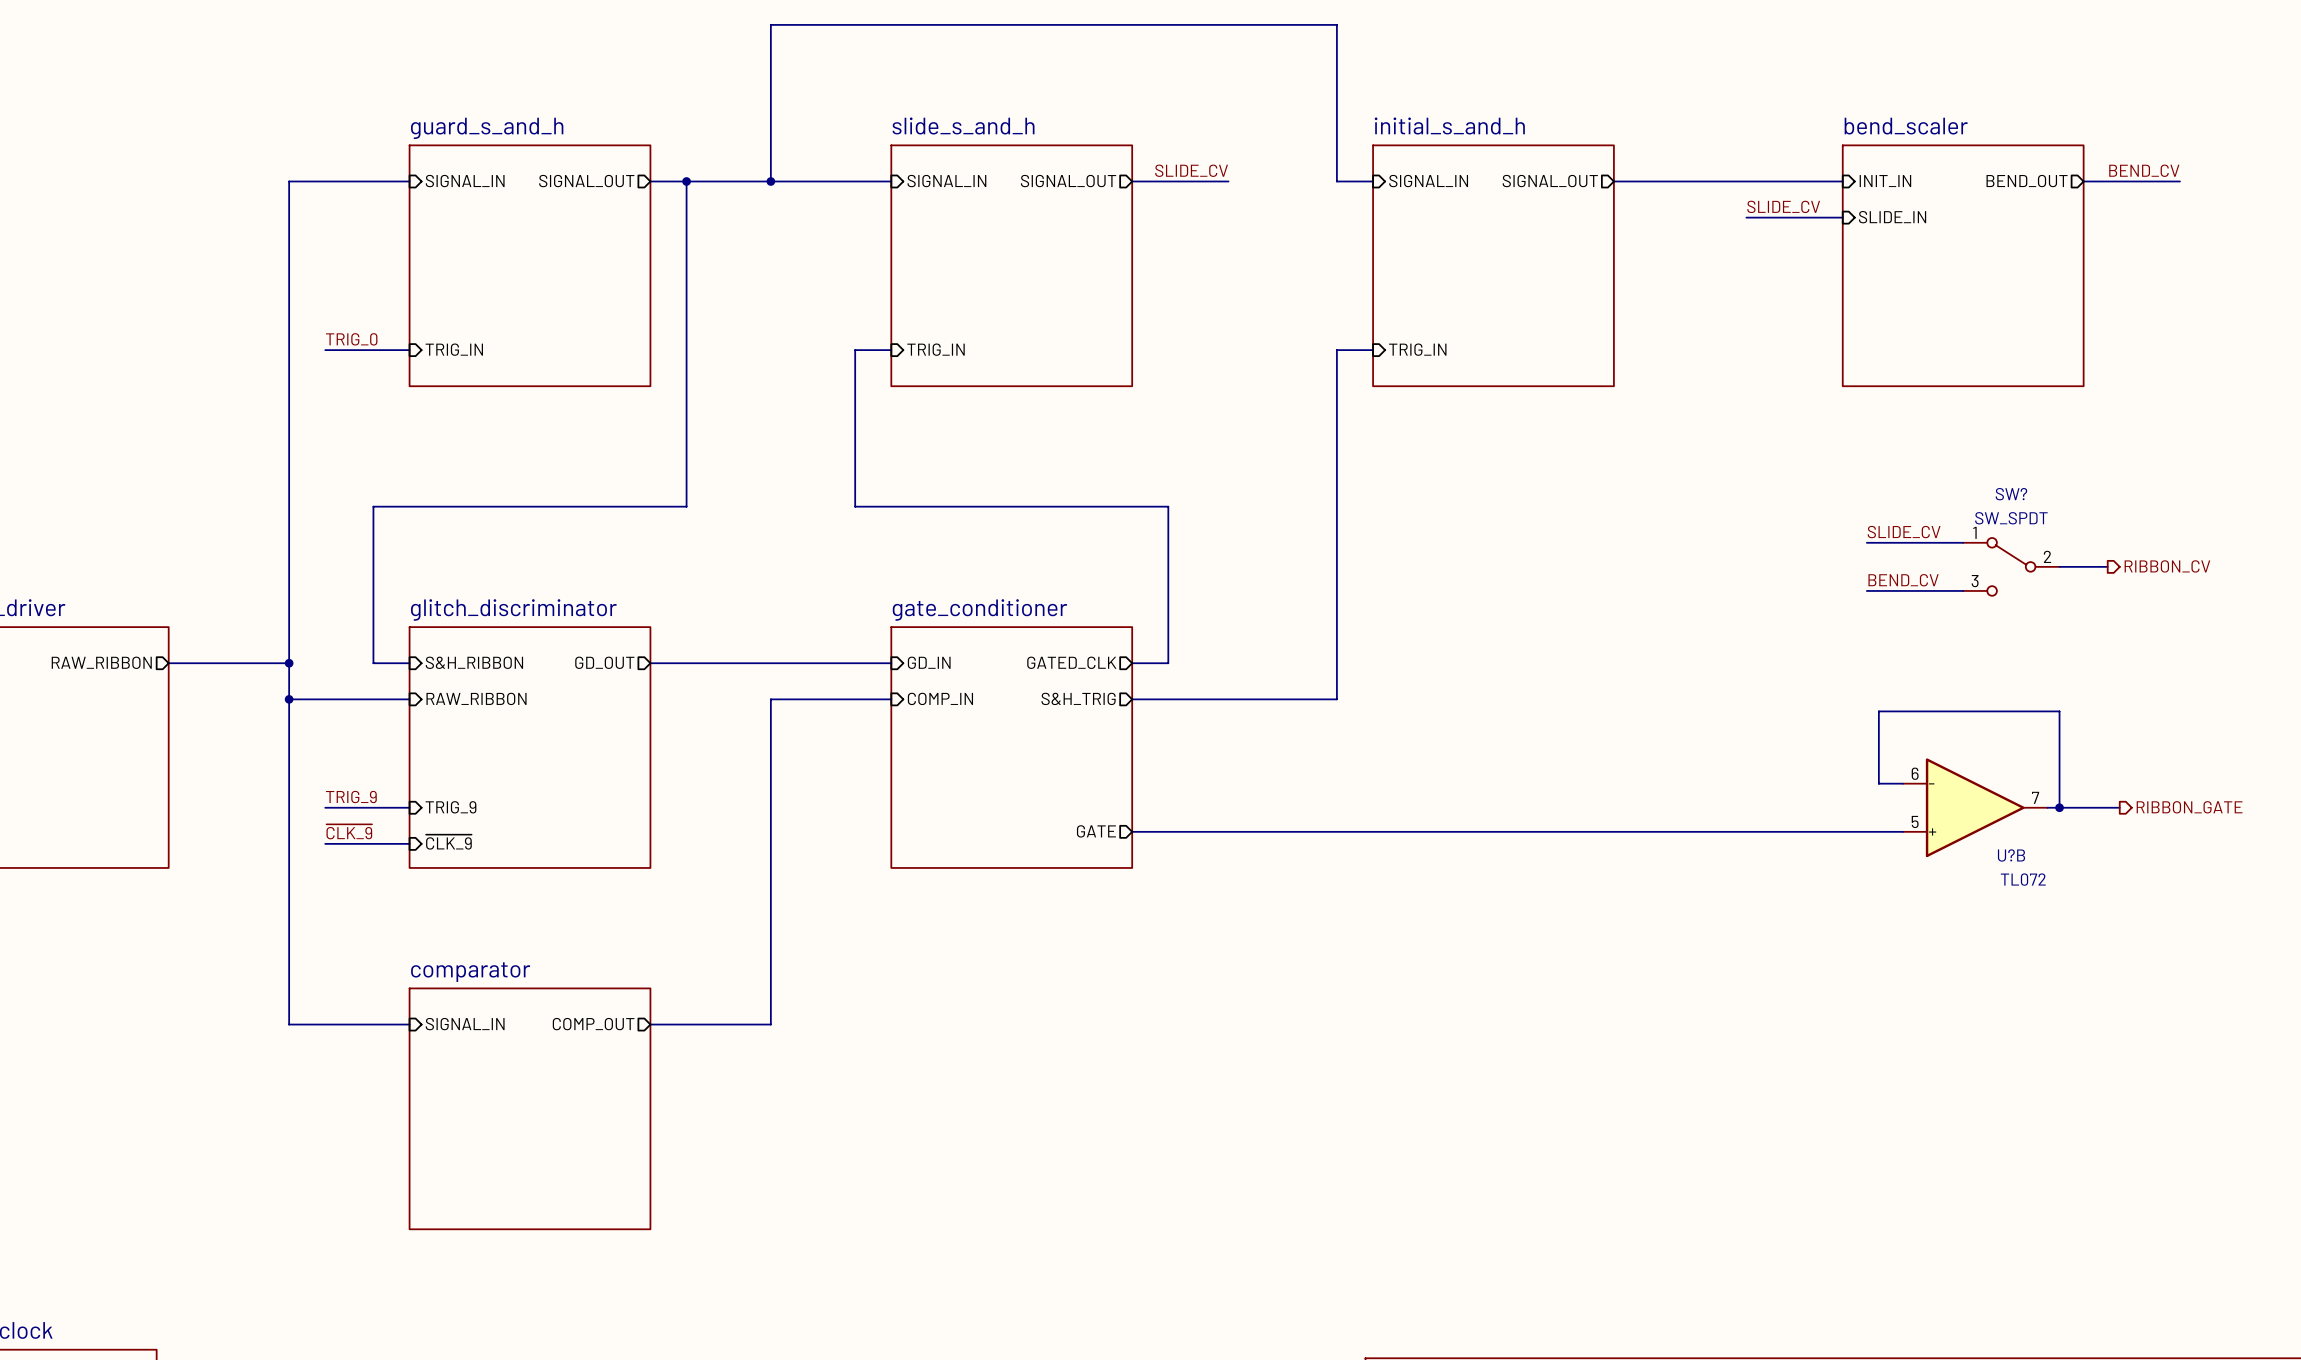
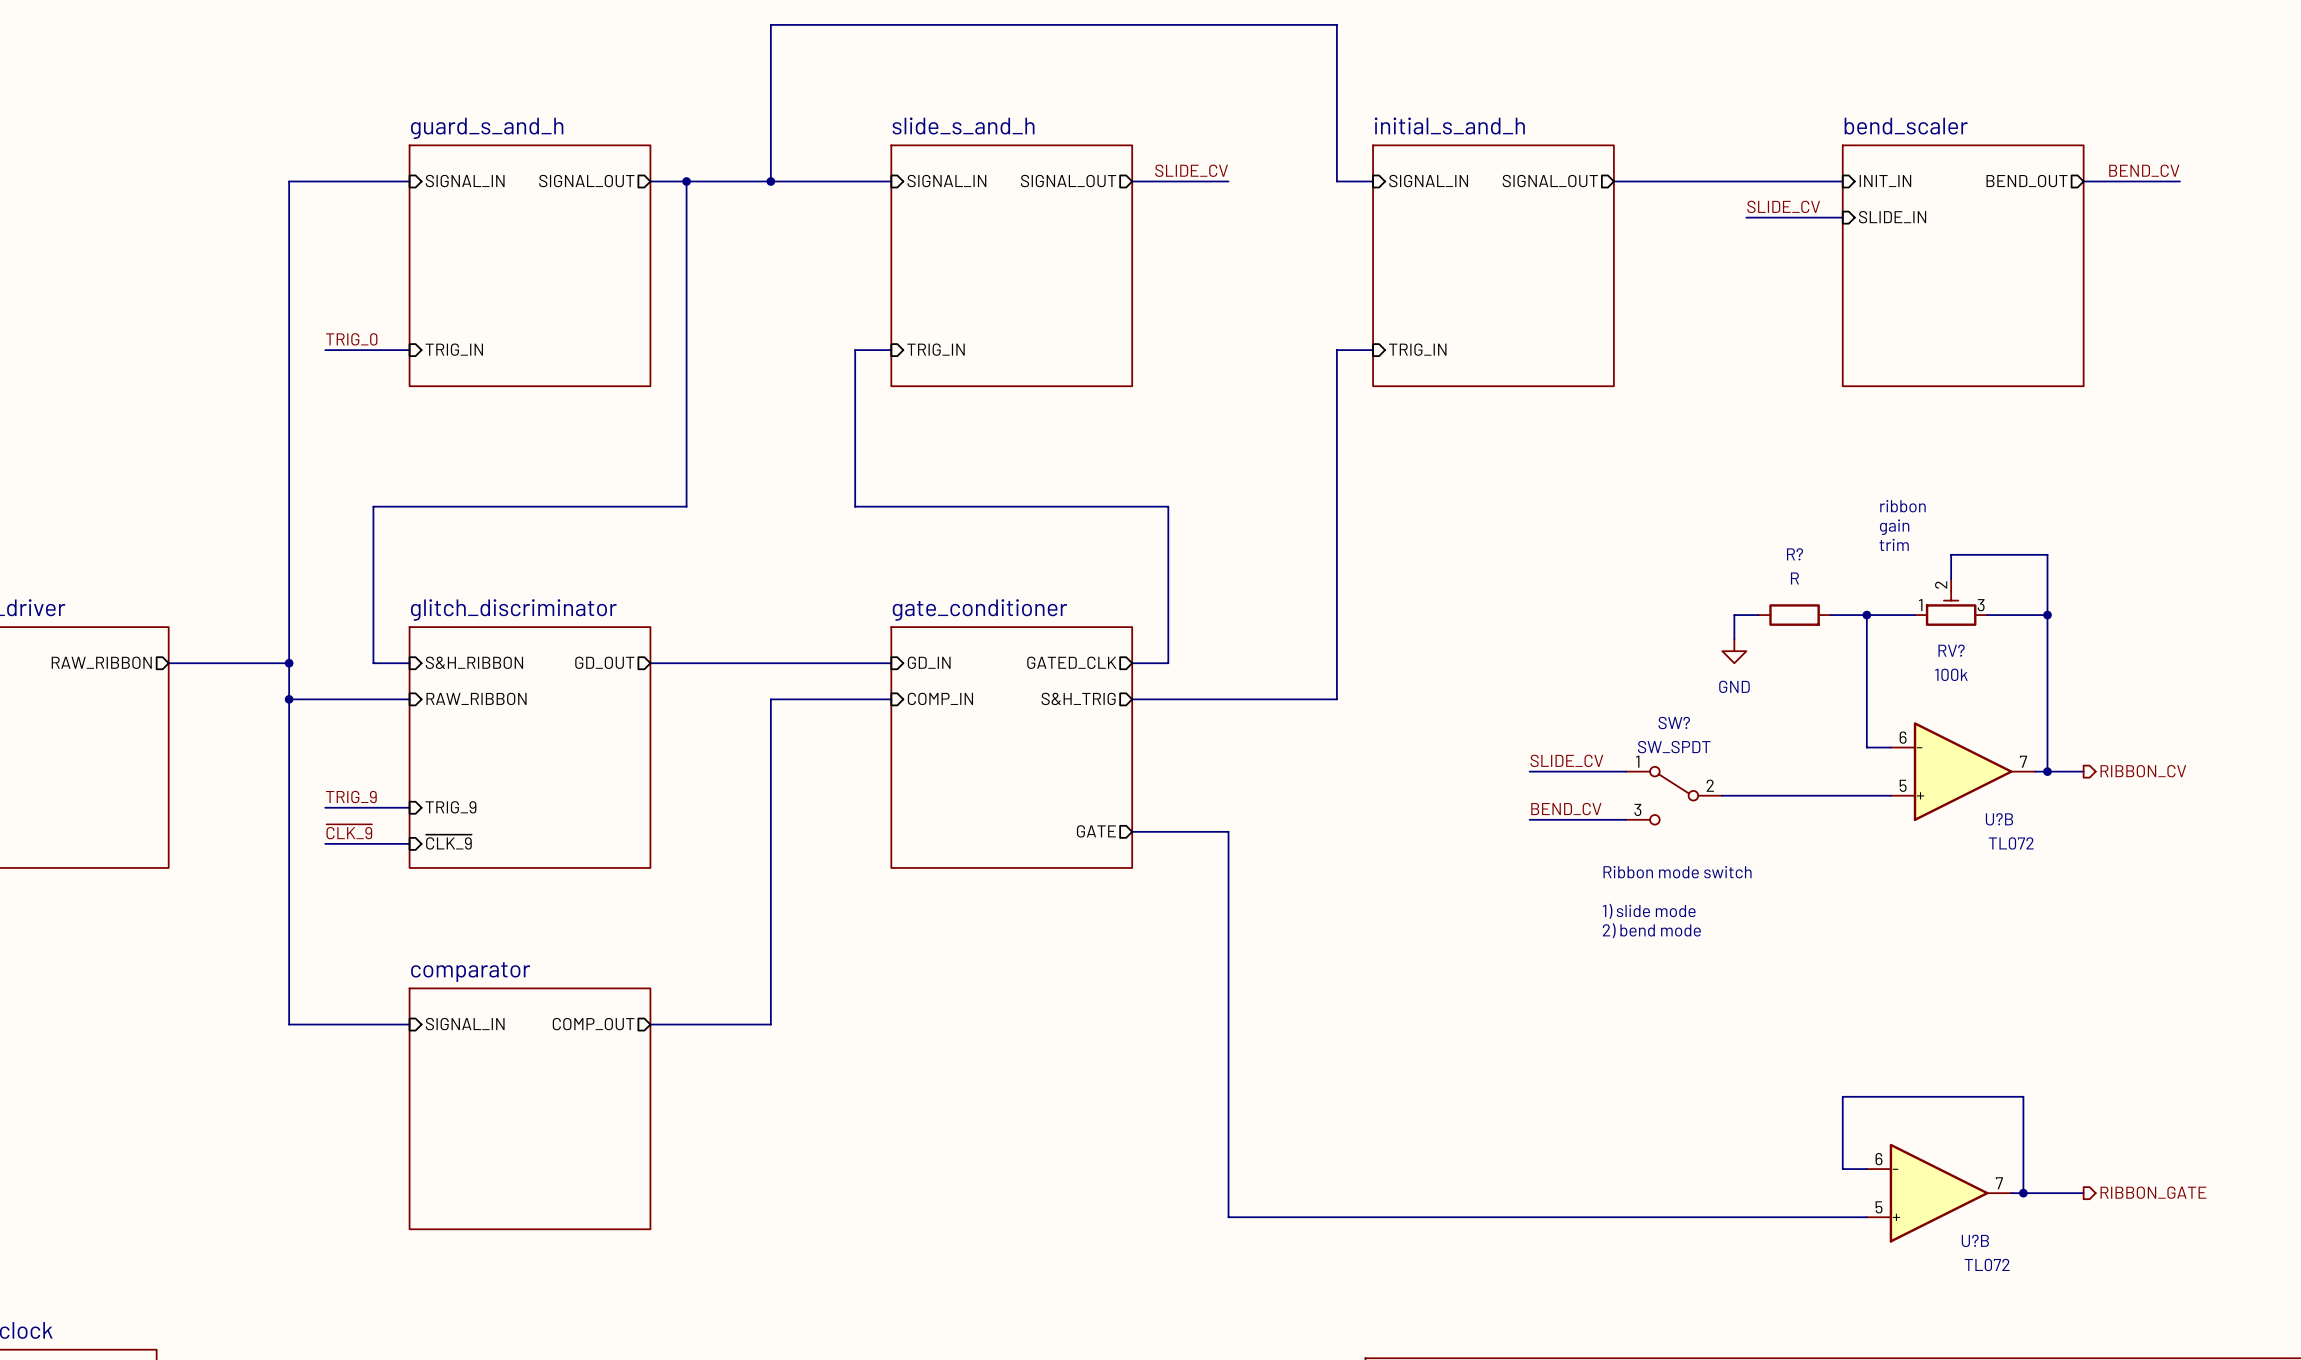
text: none -> ribbon (1902, 506)
text: none -> gain (1894, 527)
label: SLIDE_CV (1904, 532) -> none
wire: (1866, 542) (1963, 542) -> none
text: none -> trim (1894, 544)
SW?: SW_SPDT (2011, 566) -> none
wire: (2059, 566) (2107, 566) -> (2035, 771) (2083, 771)
hierarchical label position: RIBBON_CV (2167, 566) -> RIBBON_CV (2143, 771)
wire: none -> (1951, 578) (1951, 554) (2047, 554) (2047, 771)
label: BEND_CV (1903, 580) -> none
wire: (1866, 590) (1963, 590) -> none
RV?: none -> 100k (1951, 602)
wire: none -> (1758, 615) (1734, 615) (1734, 639)
R?: none -> R (1794, 615)
wire: none -> (1830, 615) (1915, 615)
wire: none -> (1866, 615) (1866, 747) (1890, 747)
junction: none -> (1866, 615)
wire: none -> (1987, 615) (2047, 615)
junction: none -> (2047, 615)
power symbol: none -> GND (1734, 651)
label: none -> SLIDE_CV (1566, 760)
wire: none -> (1529, 771) (1625, 771)
wire: (1902, 783) (1878, 783) (1878, 711) (2059, 711) (2059, 807) -> none
SW?: none -> SW_SPDT (1674, 795)
wire: none -> (1722, 795) (1890, 795)
U?B position: (1975, 807) -> (1963, 771)
wire: (2047, 807) (2119, 807) -> none
junction position: (2059, 807) -> (2047, 771)
hierarchical label: RIBBON_GATE (2189, 807) -> none
label: none -> BEND_CV (1566, 809)
wire: none -> (1529, 819) (1625, 819)
wire: (1228, 831) (1902, 831) -> (1228, 831) (1228, 1217) (1866, 1217)
text: none -> Ribbon mode switch (1677, 872)
text: none -> 1) slide mode (1649, 911)
text: none -> 2) bend mode (1651, 930)
wire: none -> (1866, 1169) (1842, 1169) (1842, 1096) (2023, 1096) (2023, 1193)
hierarchical label: none -> RIBBON_GATE (2153, 1192)
U?B: none -> TL072 (1939, 1193)
wire: none -> (2011, 1193) (2083, 1193)
junction: none -> (2023, 1193)

